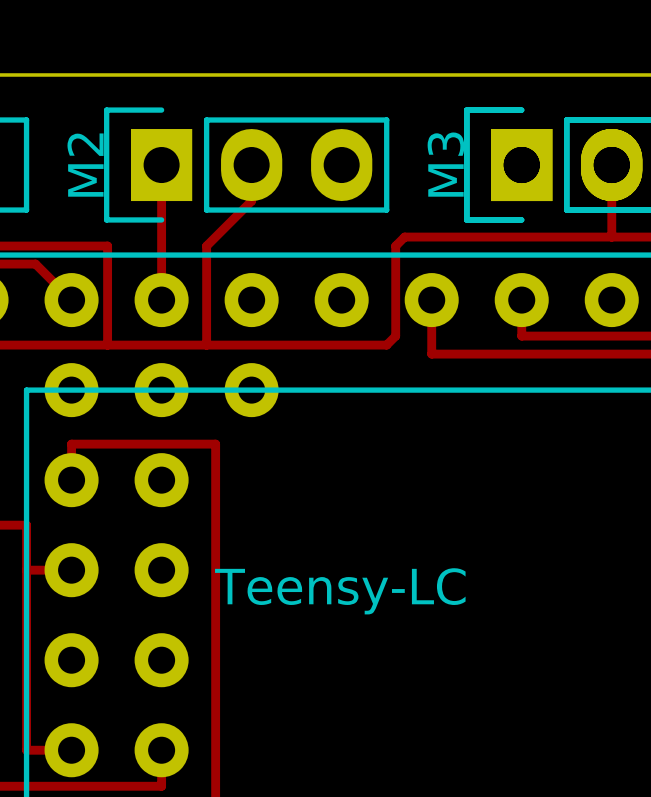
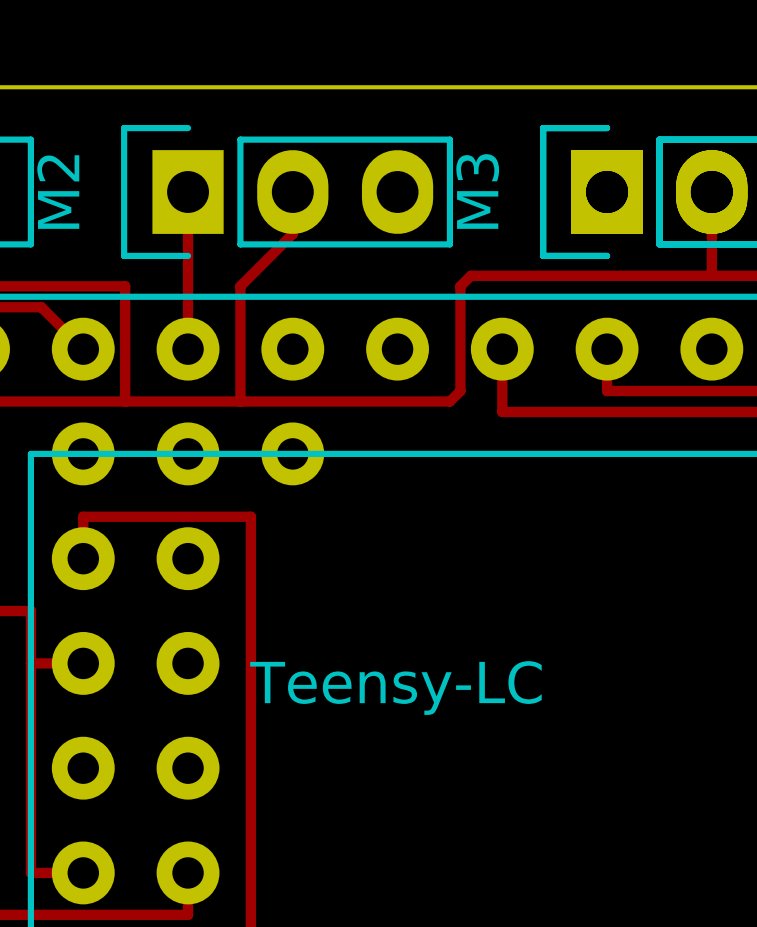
part value position: M3 (446, 164) -> M3 (477, 191)
part value position: M2 (85, 165) -> M2 (58, 192)

